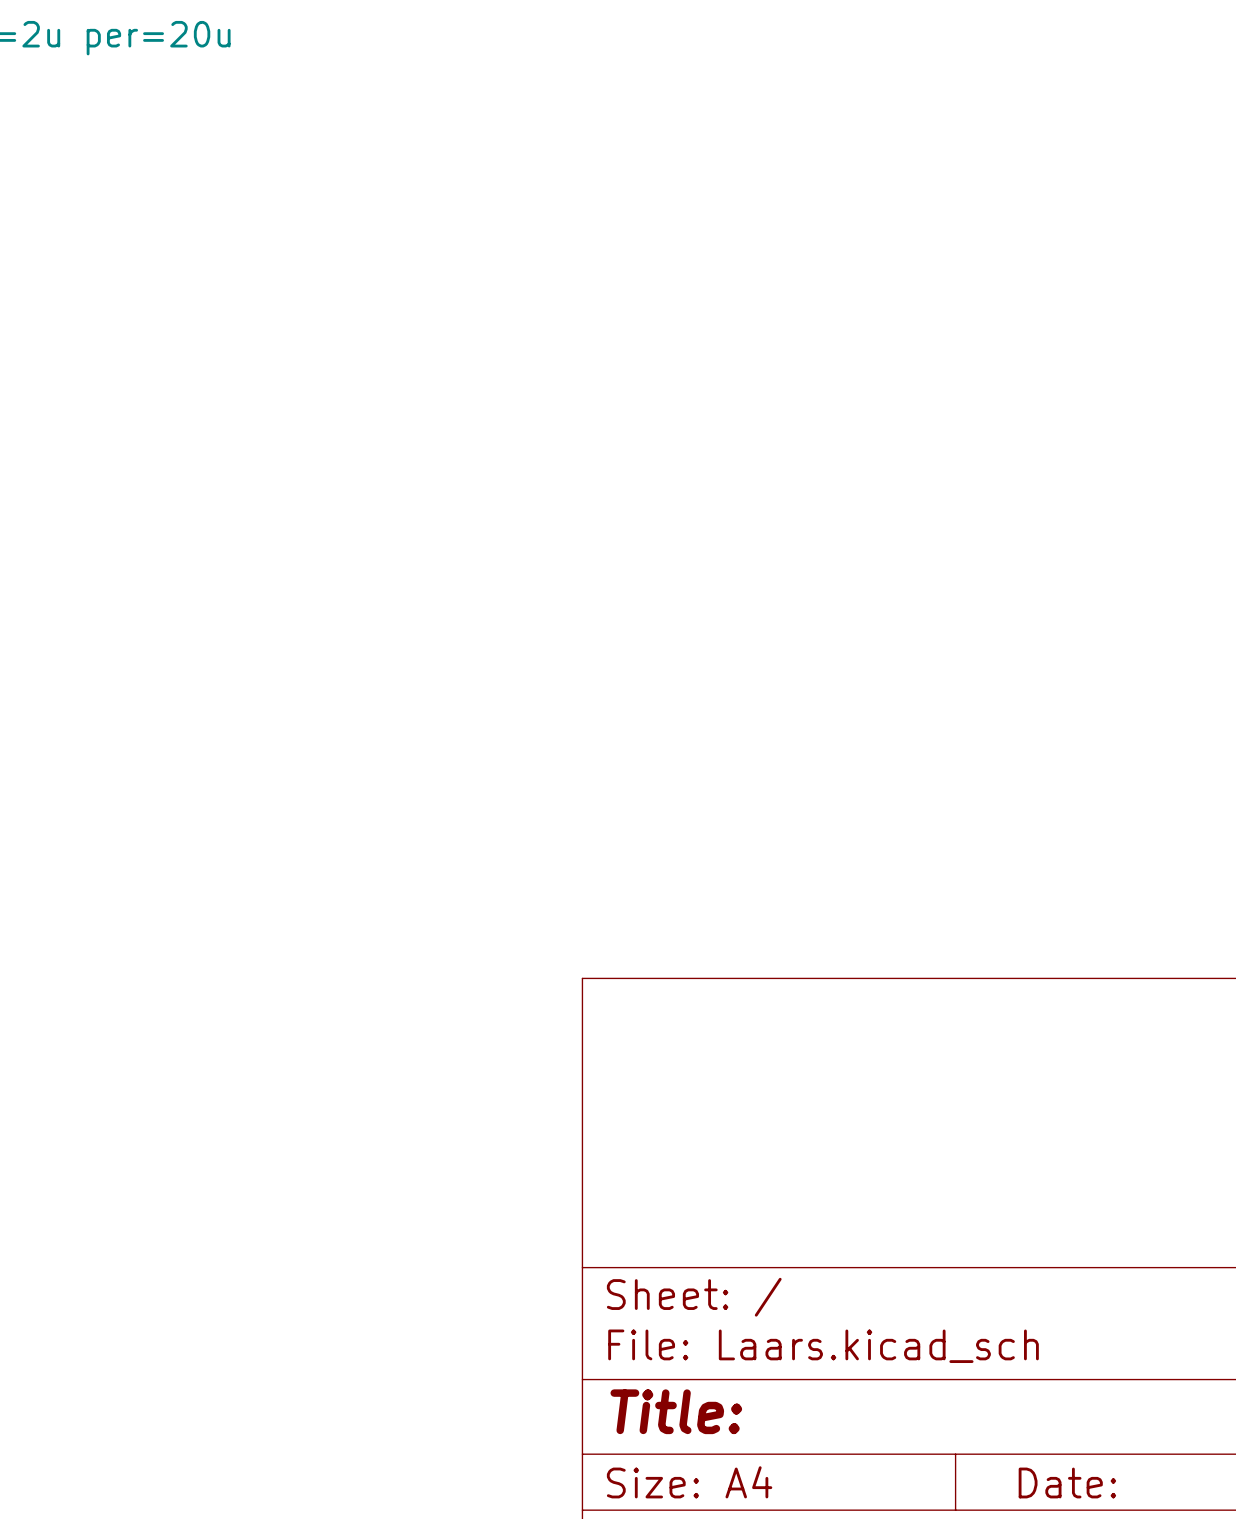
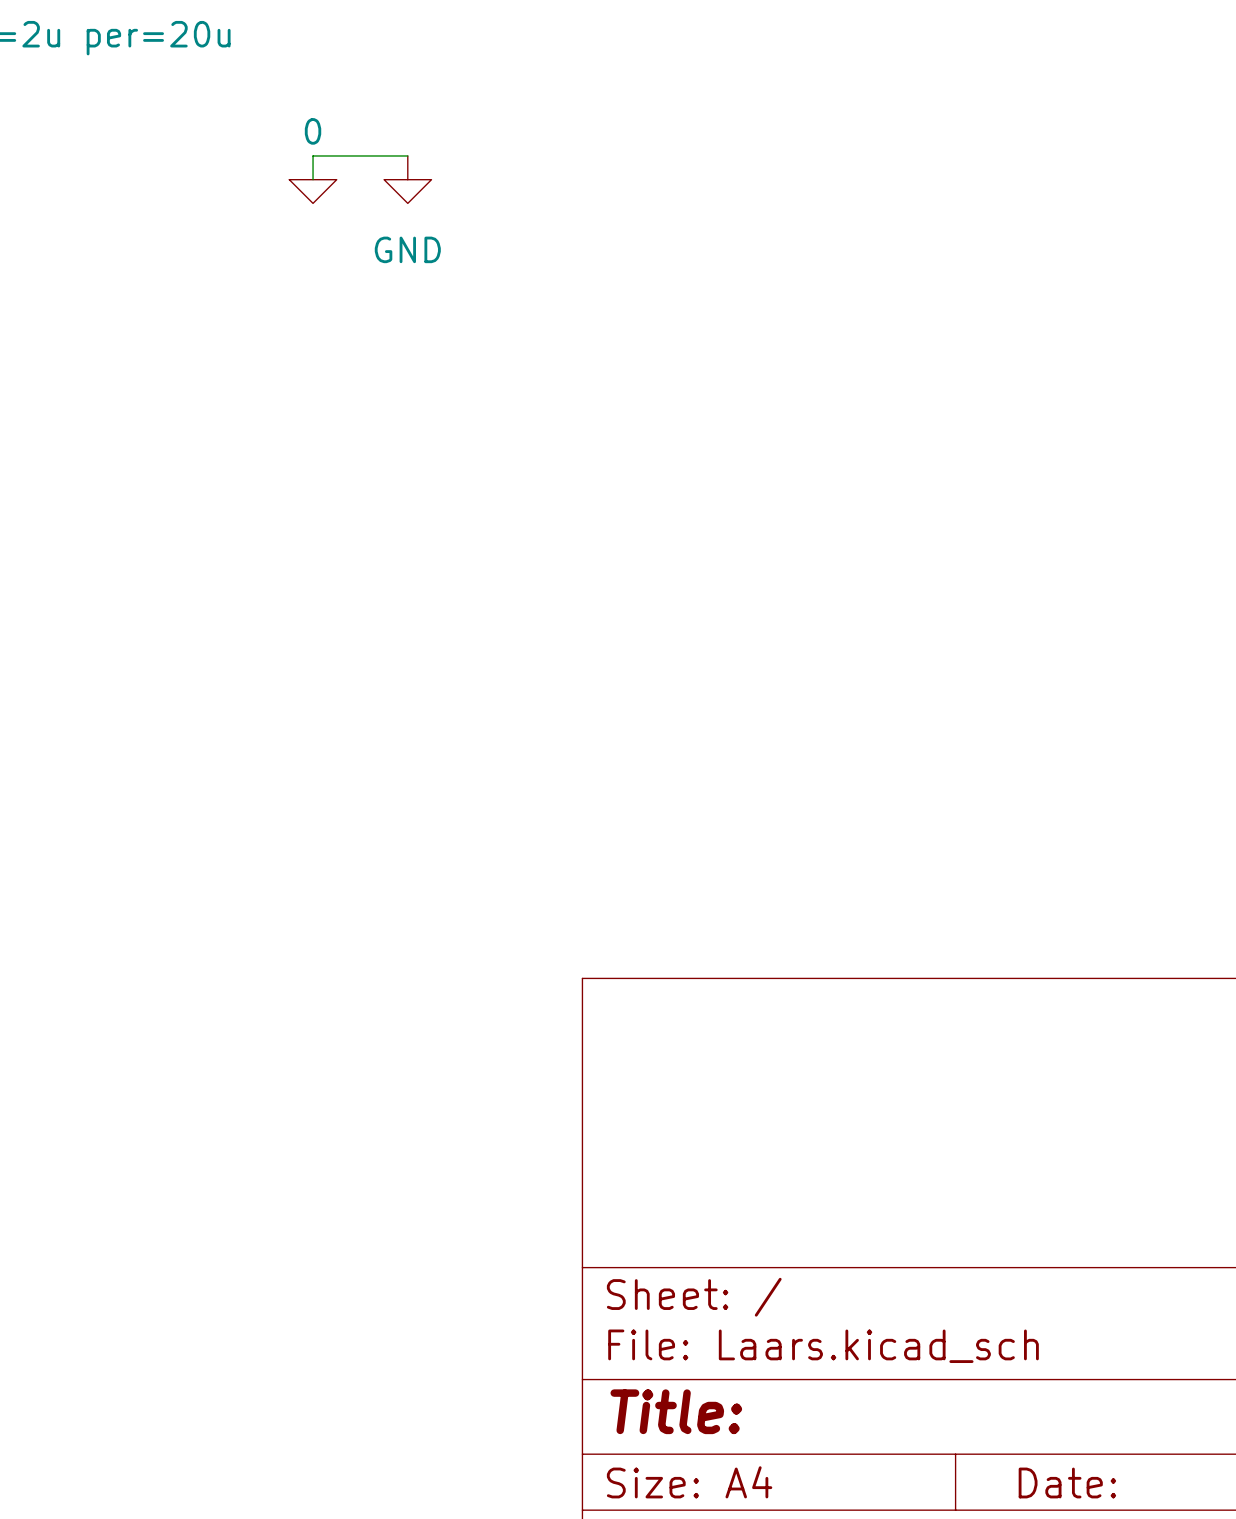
wire: none -> (407, 155) (313, 155) (313, 179)
power symbol: none -> GND (407, 179)
power symbol: none -> 0 (313, 191)

